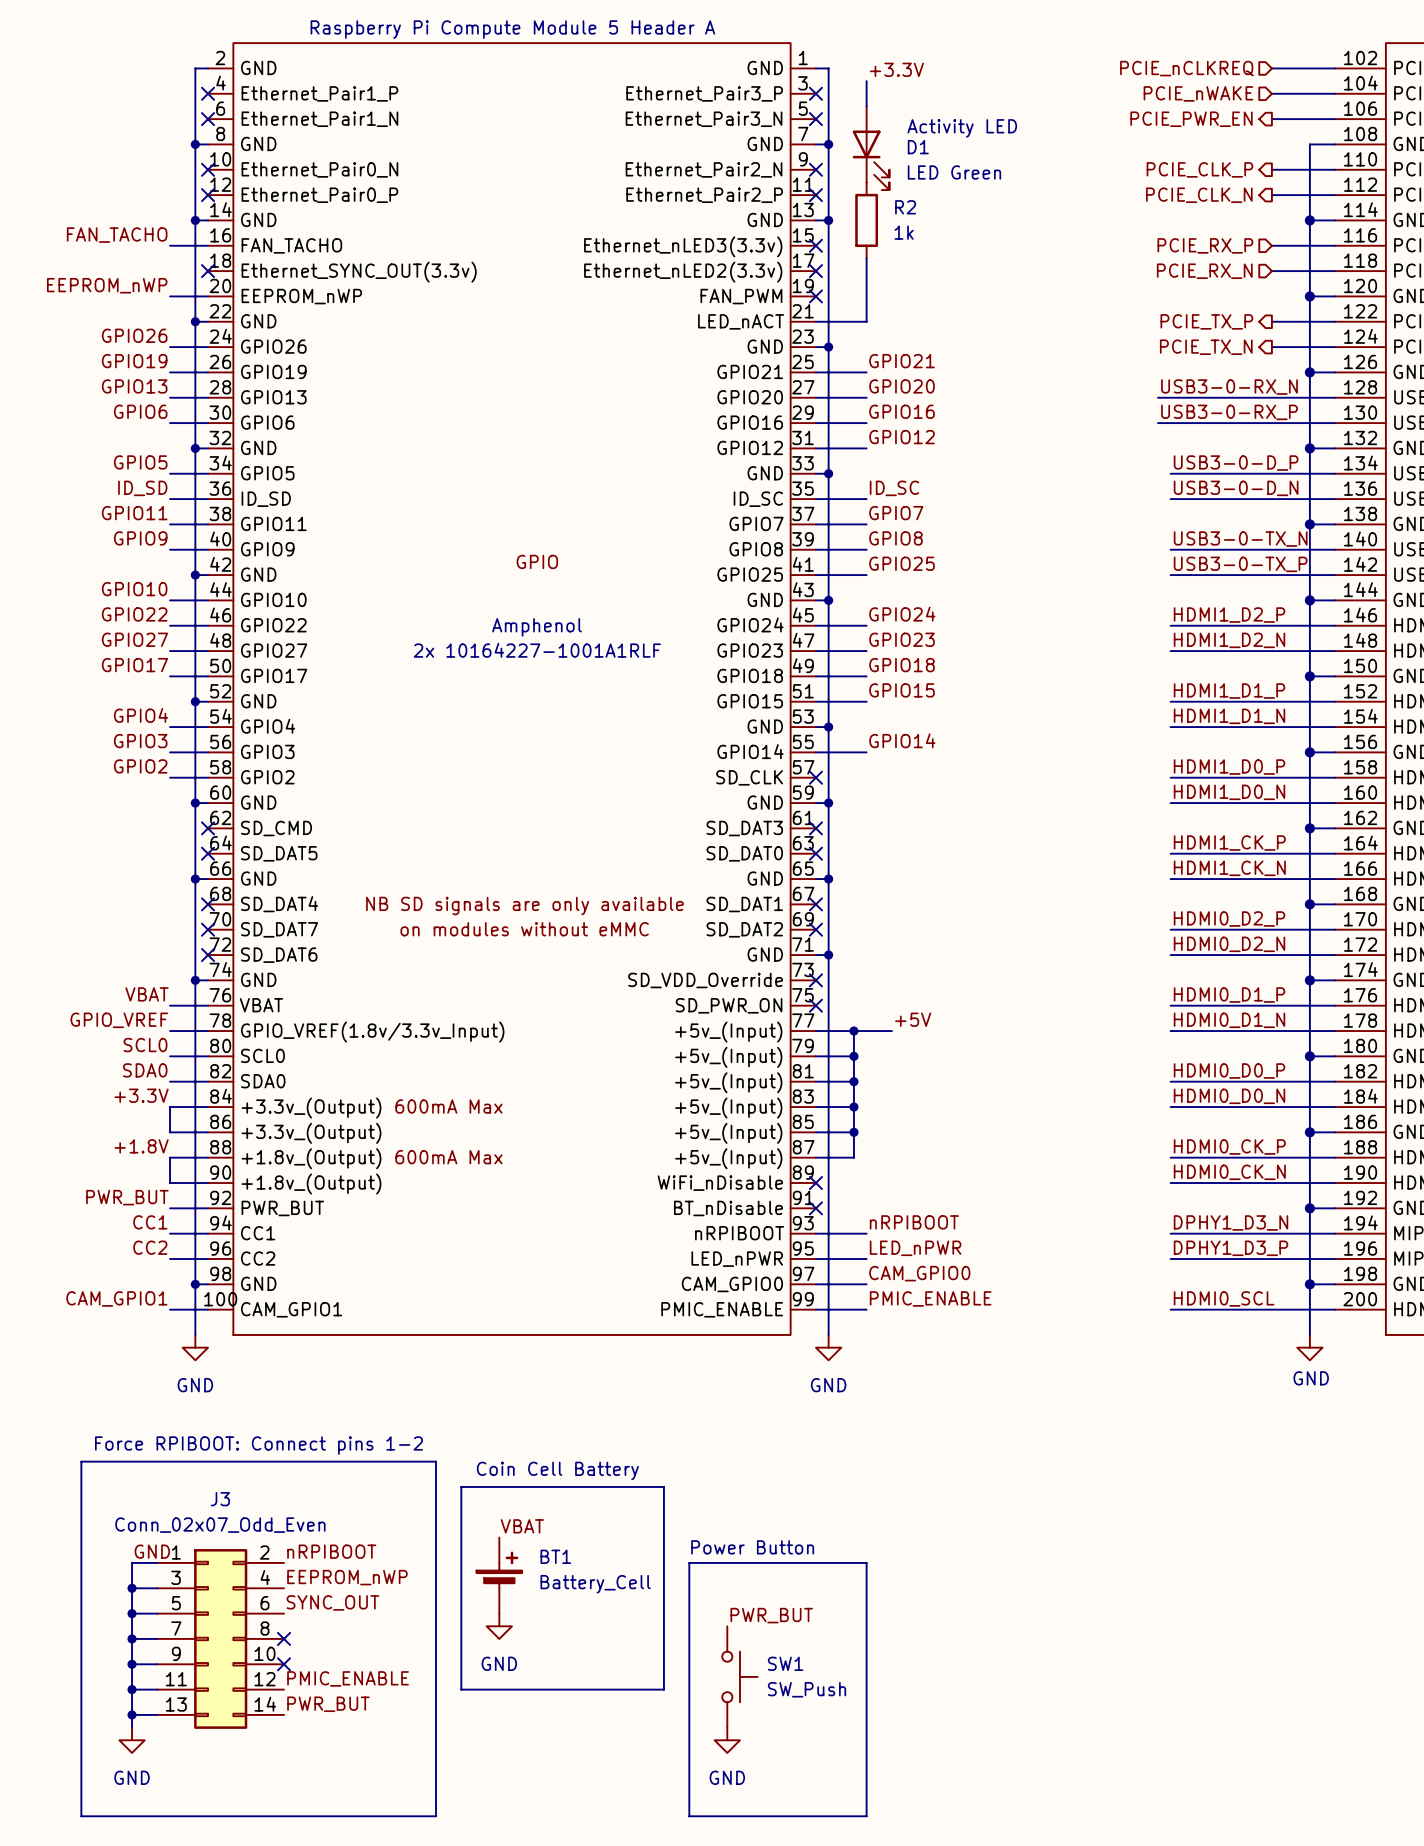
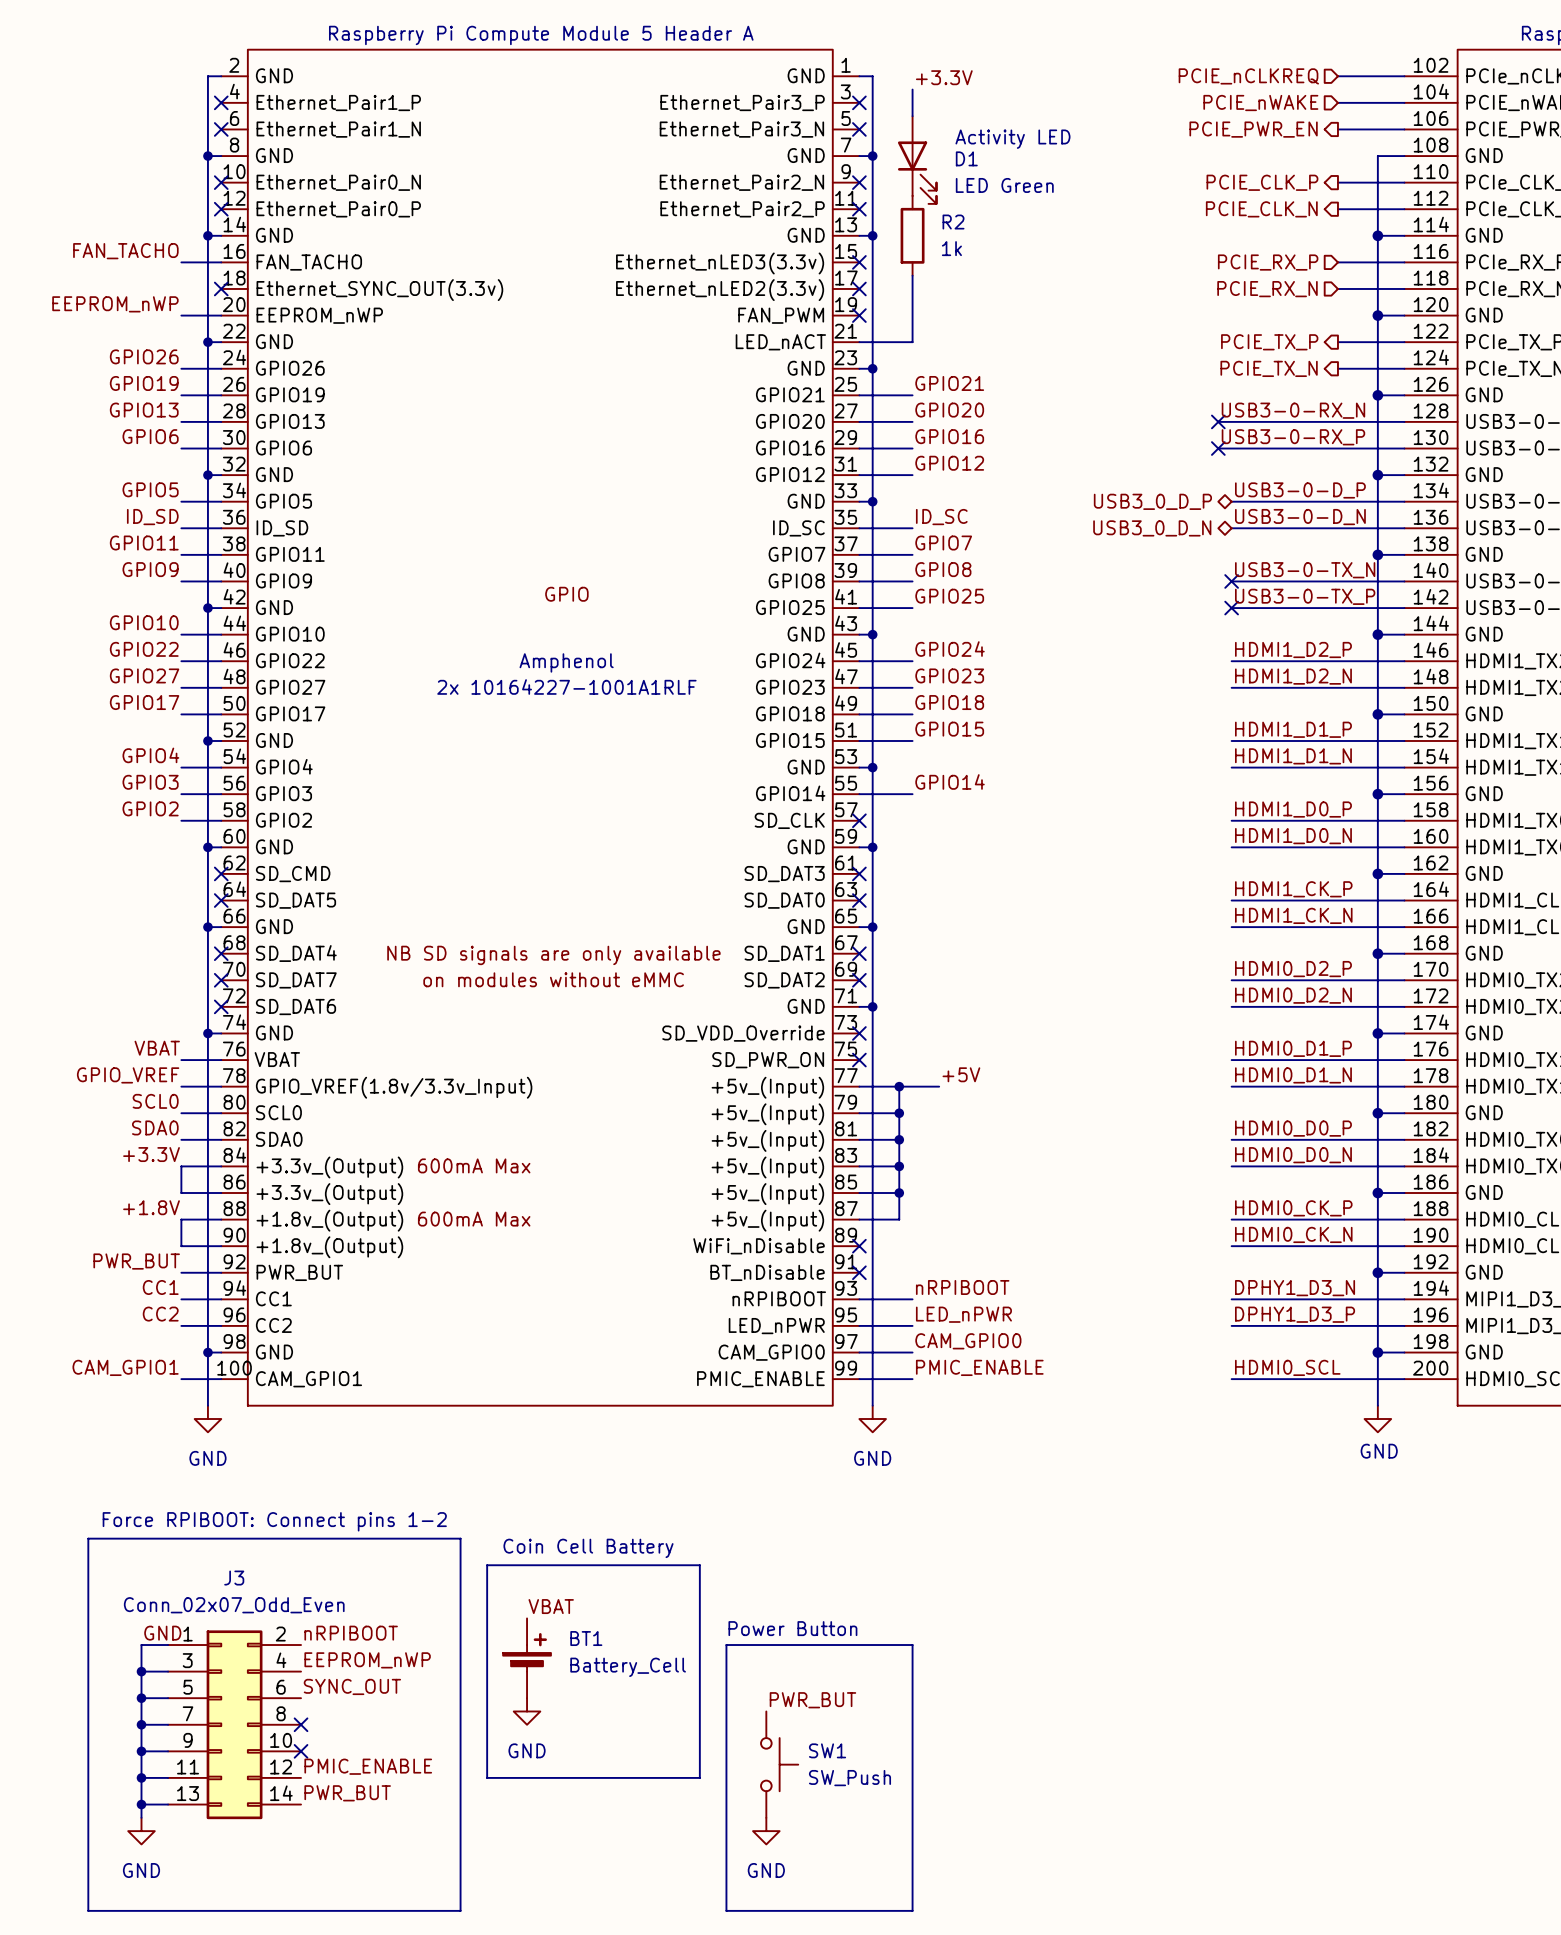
no-connect mark: none -> (1218, 421)
no-connect mark: none -> (1218, 448)
hierarchical label: none -> USB3_0_D_P (1152, 501)
hierarchical label: none -> USB3_0_D_N (1152, 528)
no-connect mark: none -> (1231, 581)
no-connect mark: none -> (1231, 608)

